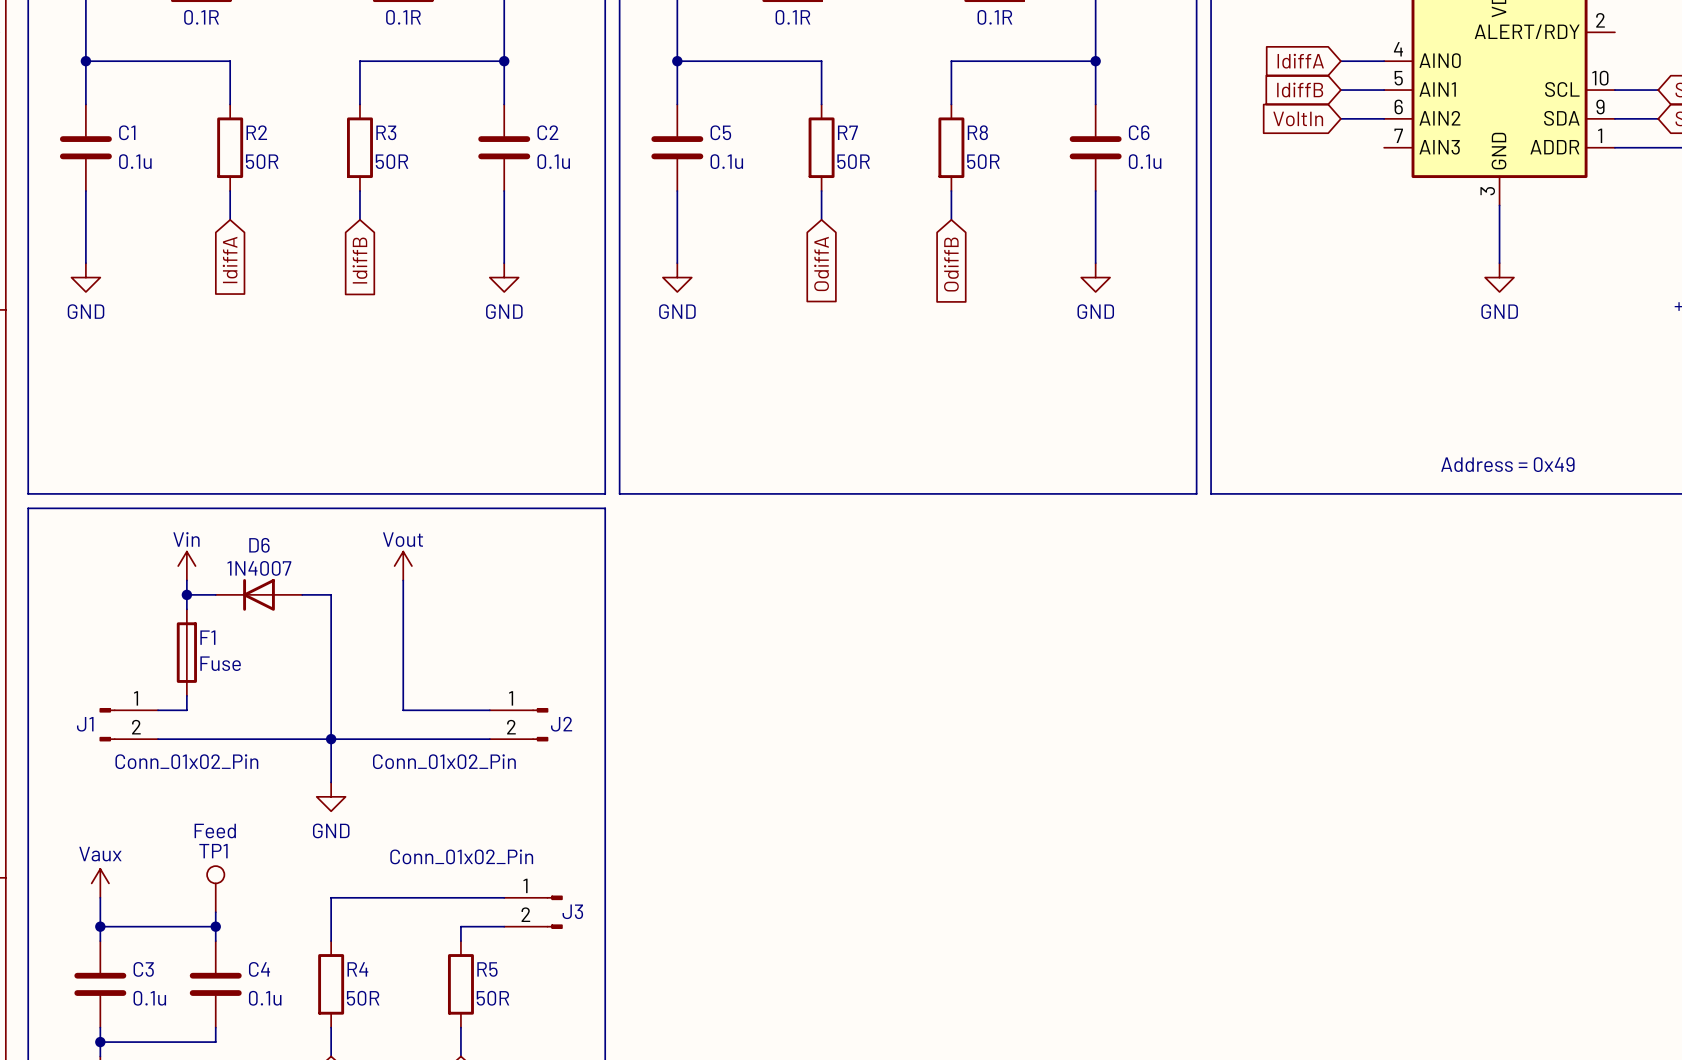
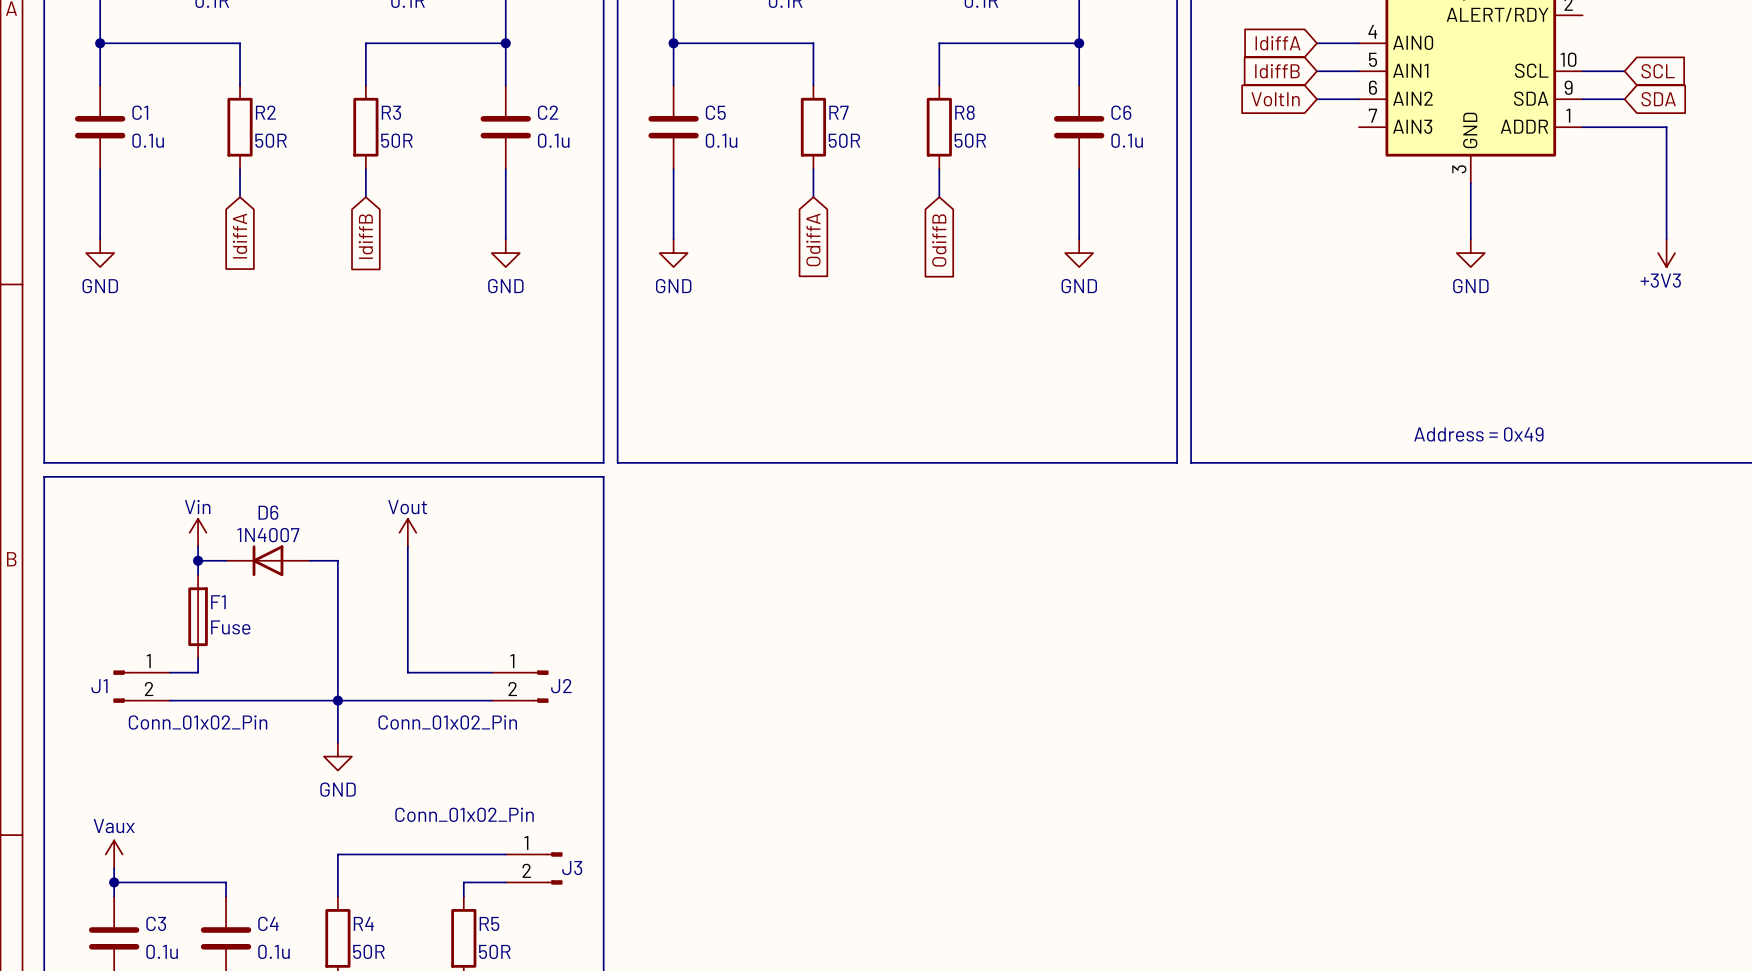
power symbol position: Vaux (100, 883) -> Vaux (114, 854)
TP1: Feed (215, 889) -> none
wire: (215, 912) (215, 926) -> none
junction: (215, 926) -> none

